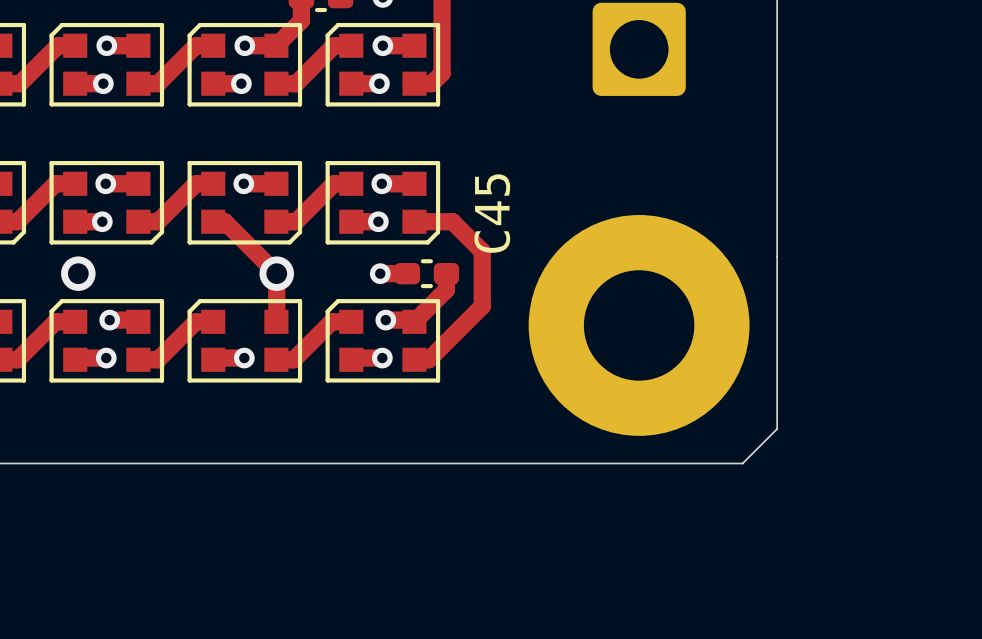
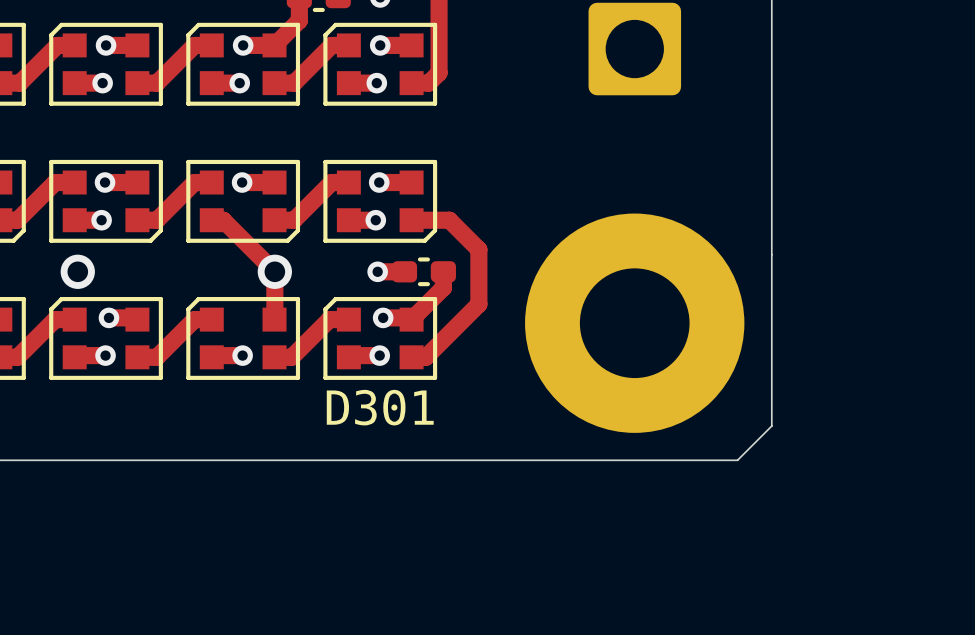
C45 name: C45 (492, 213) -> none
text: none -> D301 (380, 407)

